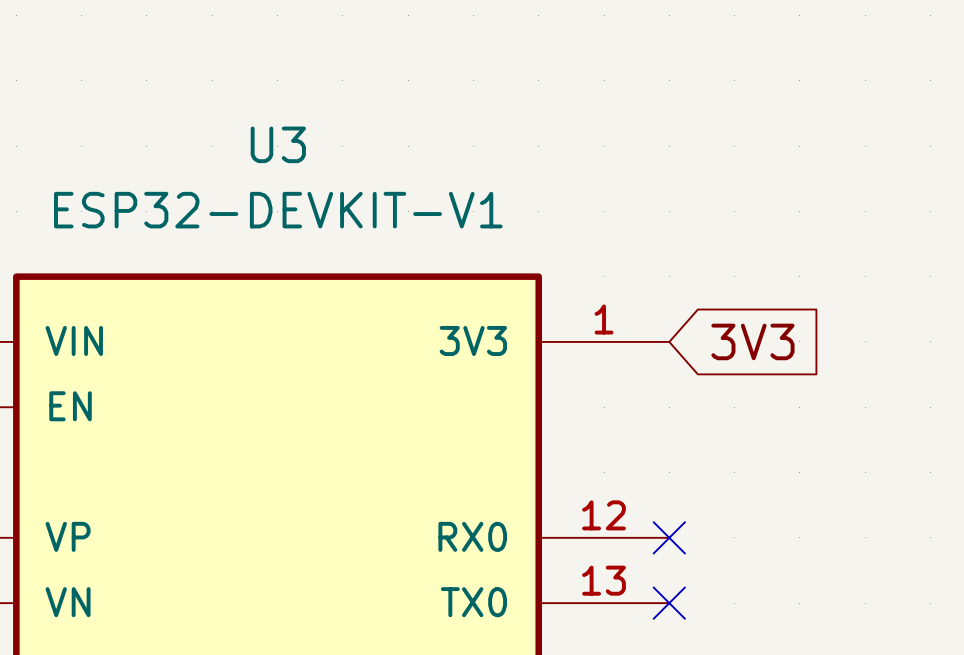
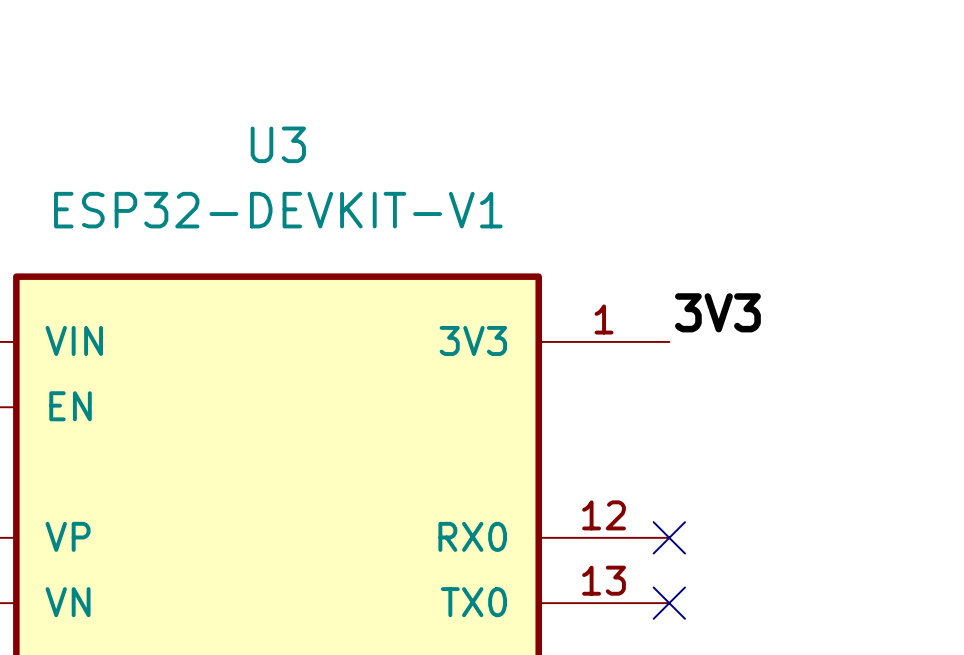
label: none -> 3V3 (717, 312)
global label: 3V3 (752, 341) -> none

